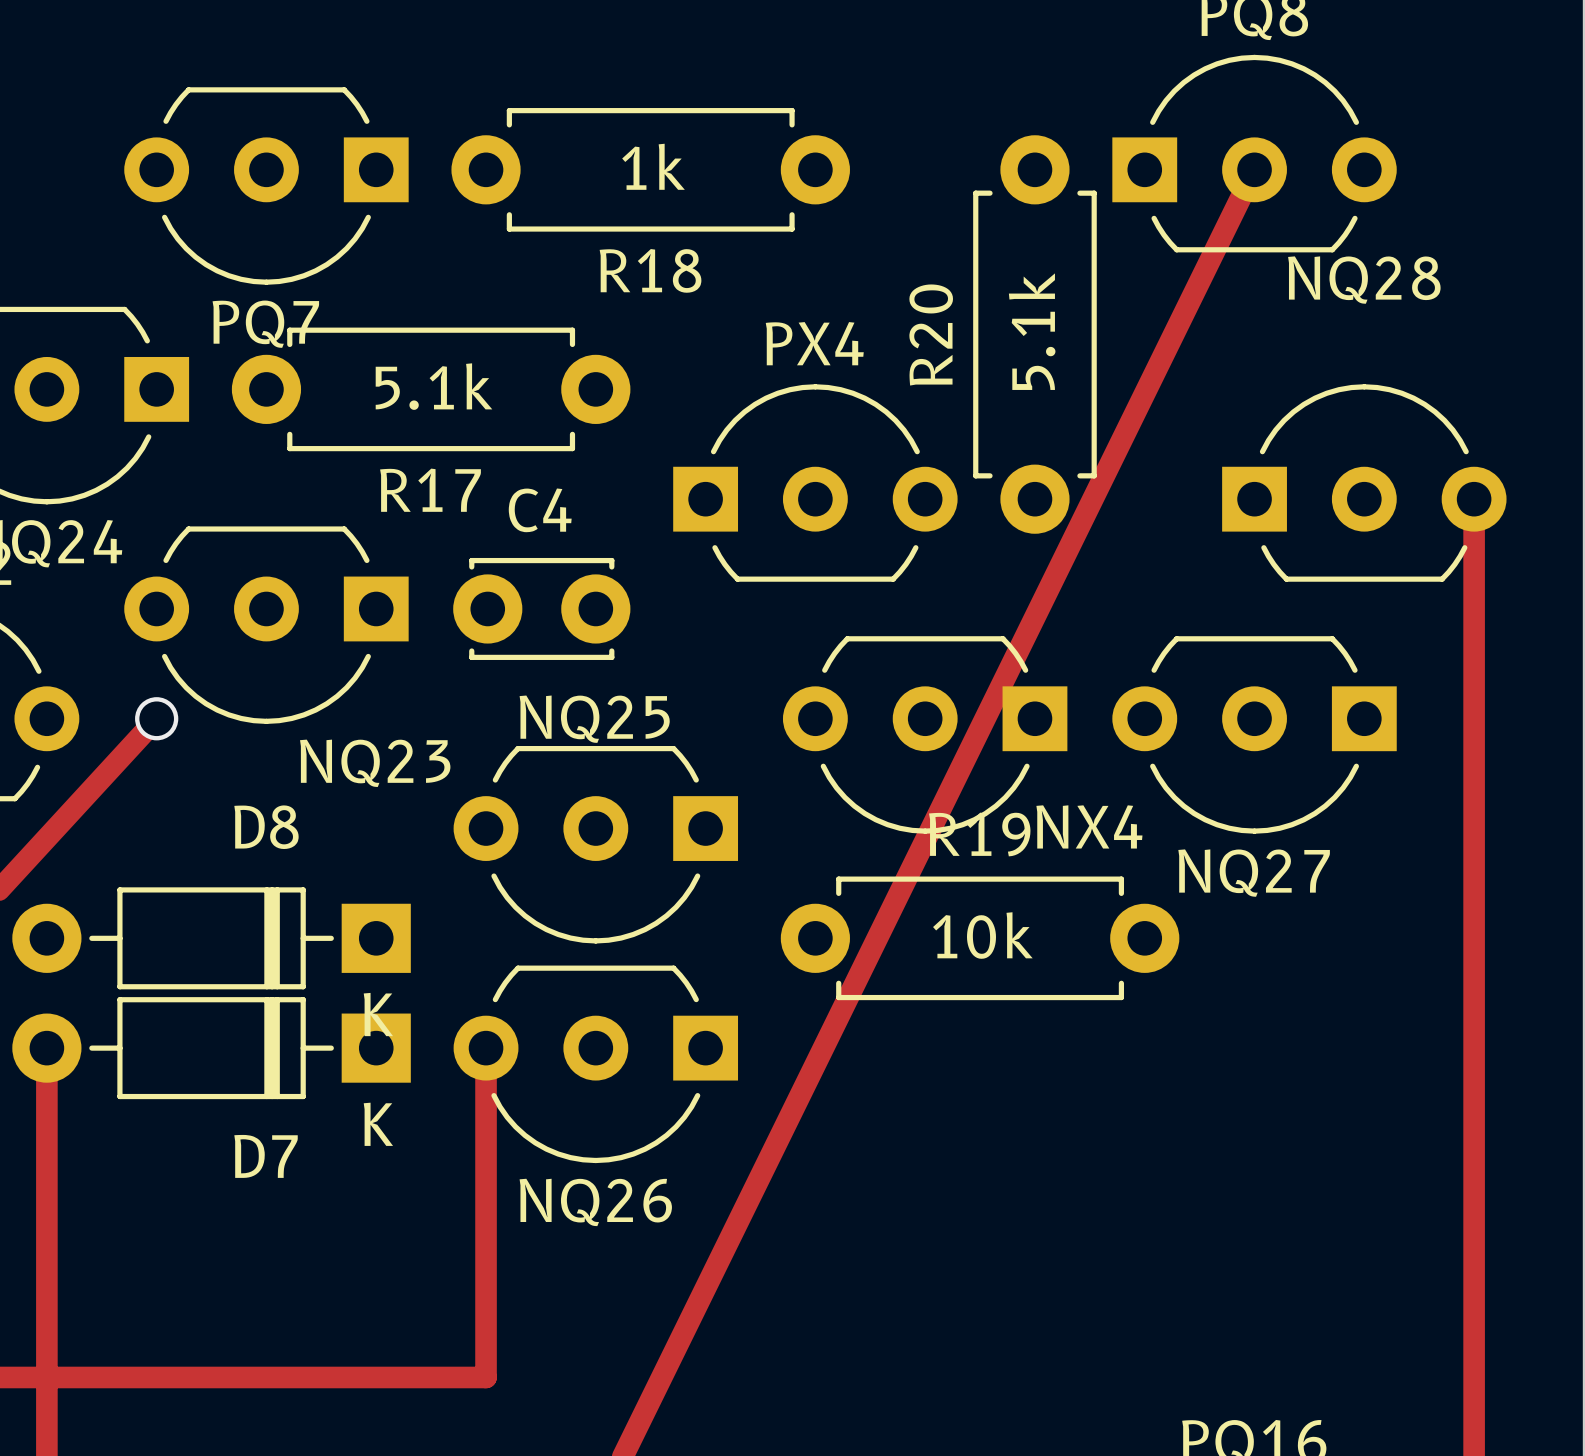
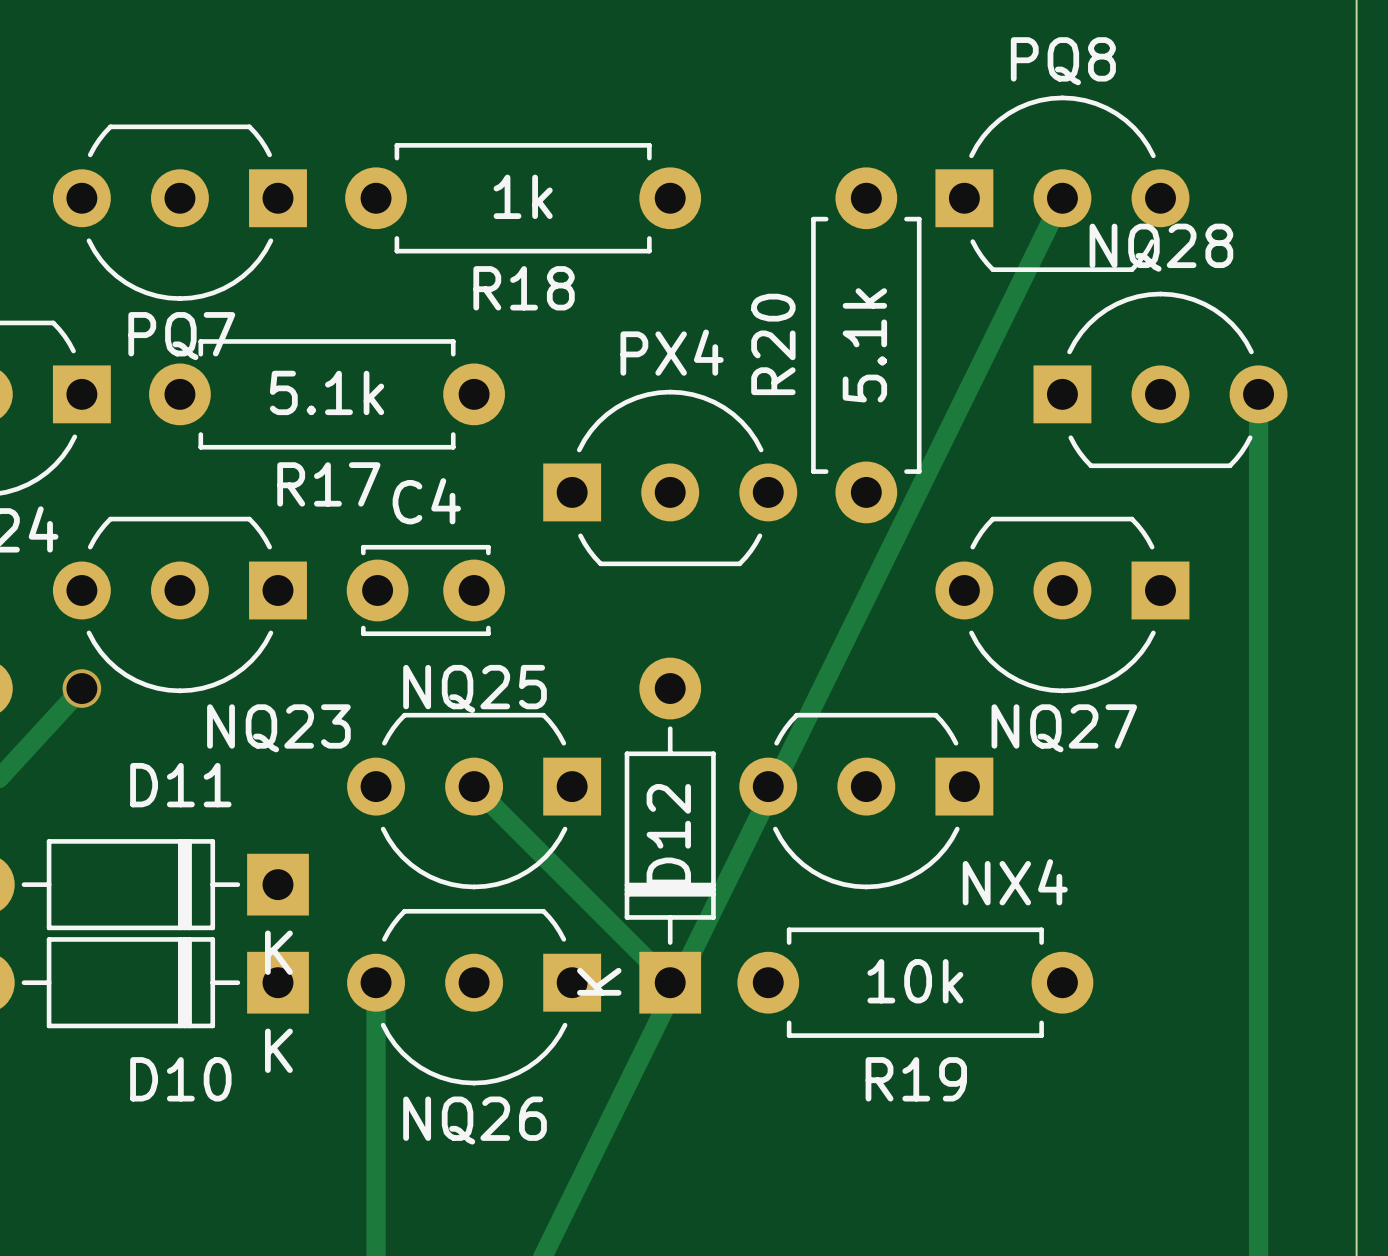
NQ28 name position: NQ28 (1364, 280) -> NQ28 (1161, 247)
track: none -> (1258, 394) (1258, 492)
NQ28 position: (1364, 482) -> (1160, 379)
NX4 position: (925, 734) -> (866, 801)
NQ27 position: (1254, 734) -> (1062, 604)
D8 name: D8 (266, 827) -> D11 (180, 785)
track: none -> (474, 786) (670, 982)
R19 name position: R19 (979, 834) -> R19 (916, 1079)
D12: none -> (670, 835)
R19 position: (980, 938) -> (915, 982)
D7 name: D7 (266, 1156) -> D10 (180, 1079)

